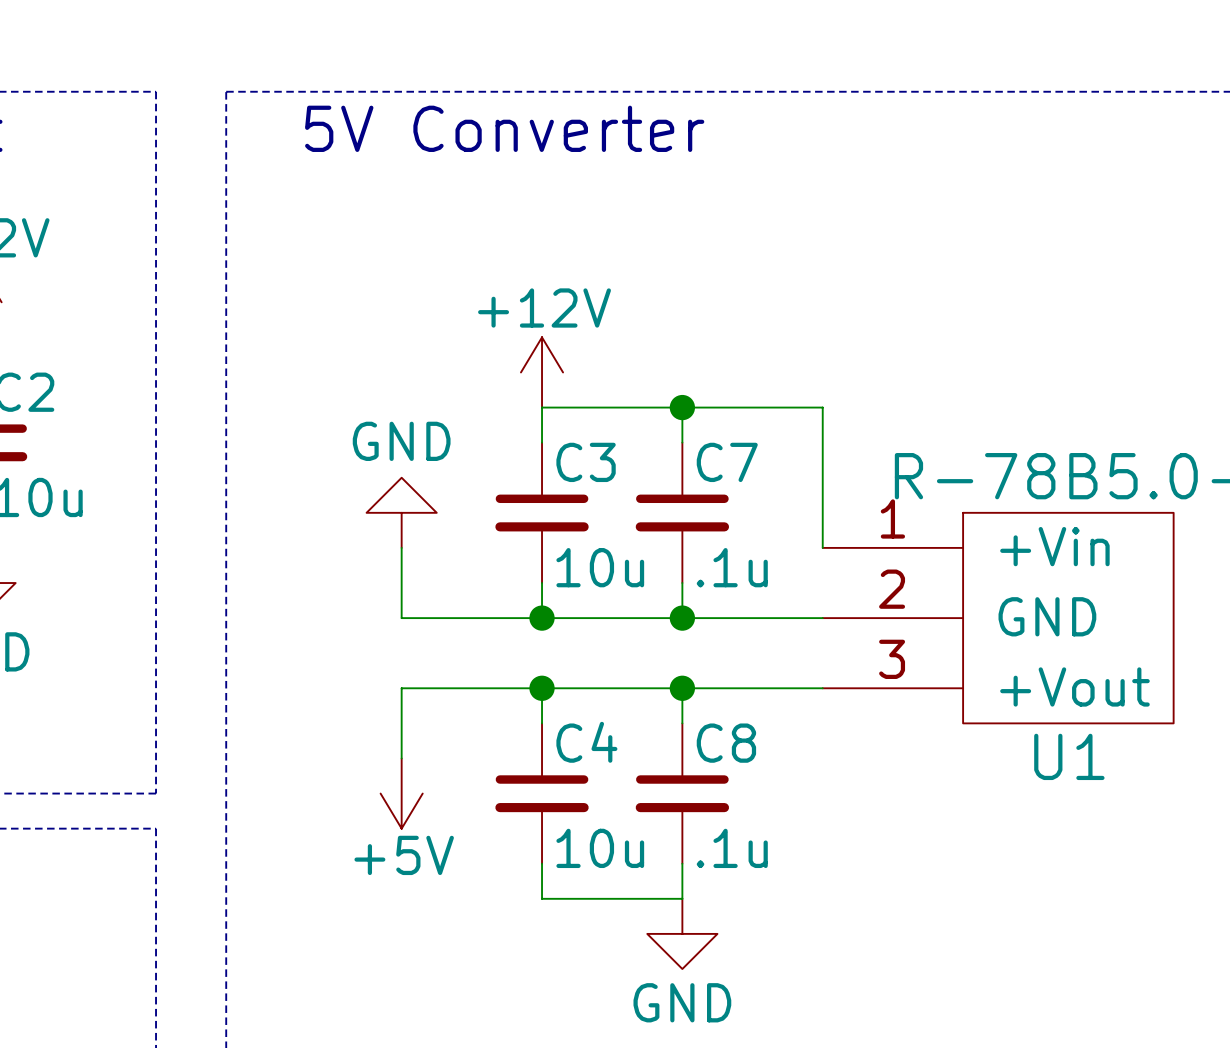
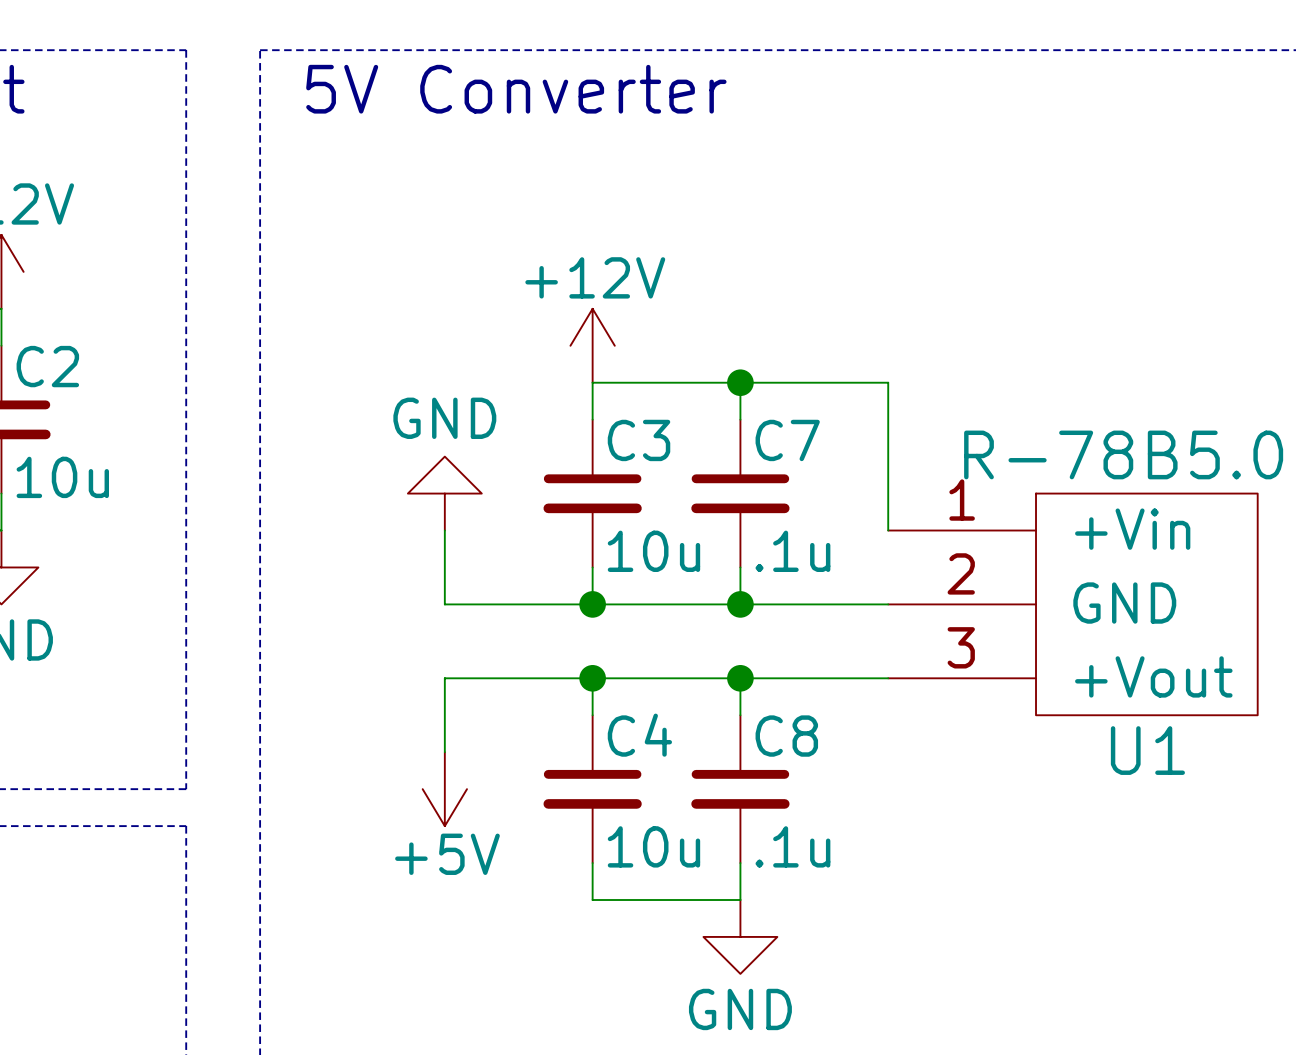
text position: 5V Converter (504, 128) -> 5V Converter (516, 89)

